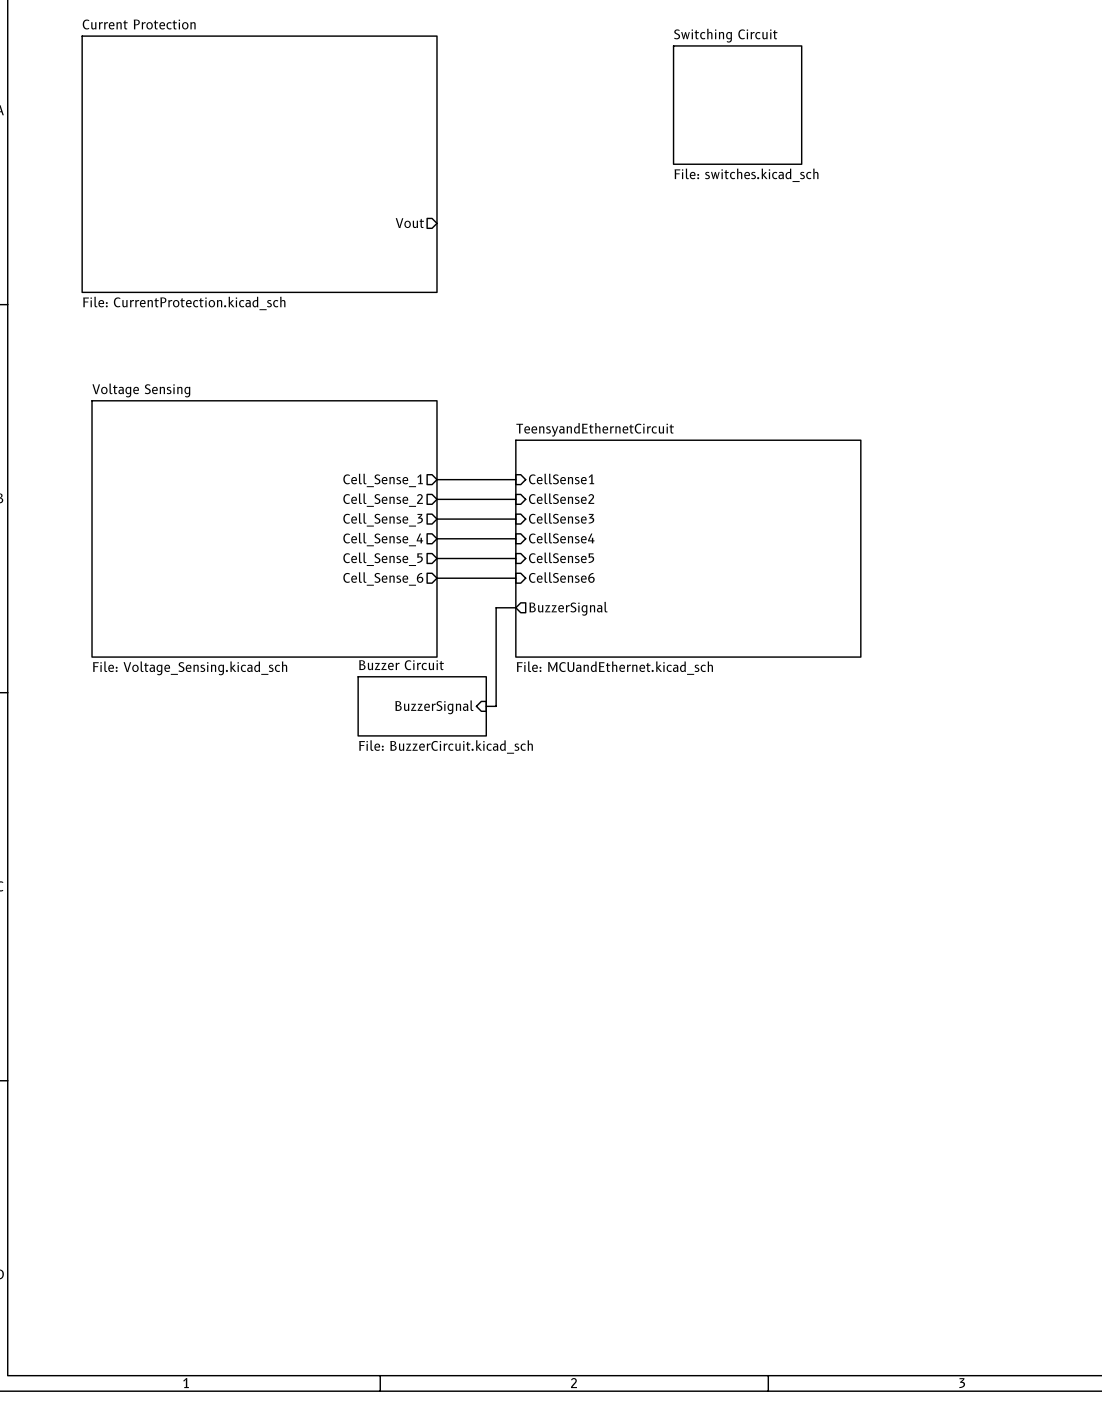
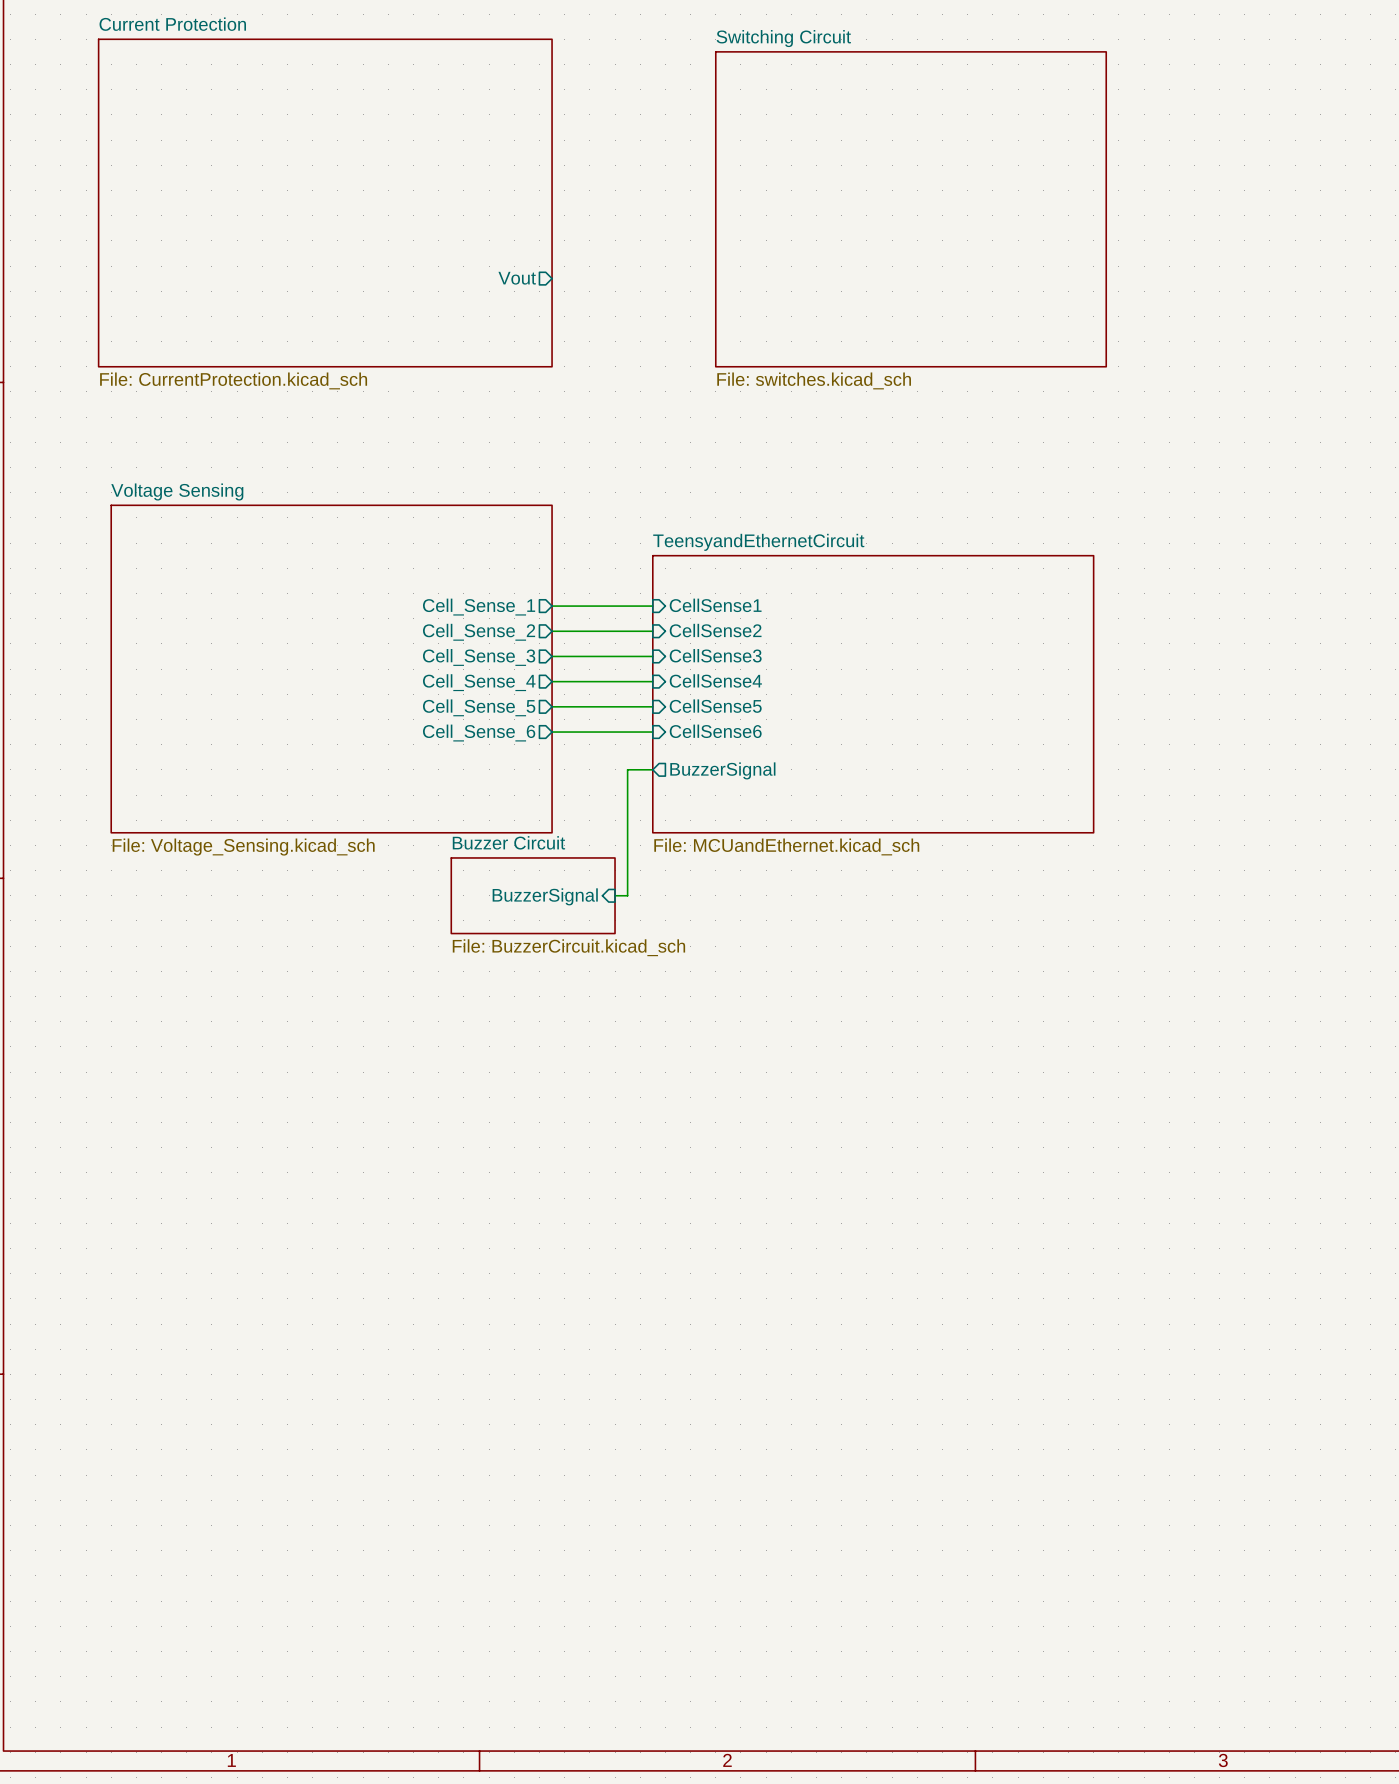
sheet Switching Circuit: File: switches.kicad_sch (737, 105) -> none
sheet Switching Circuit: none -> File: switches.kicad_sch (911, 209)

